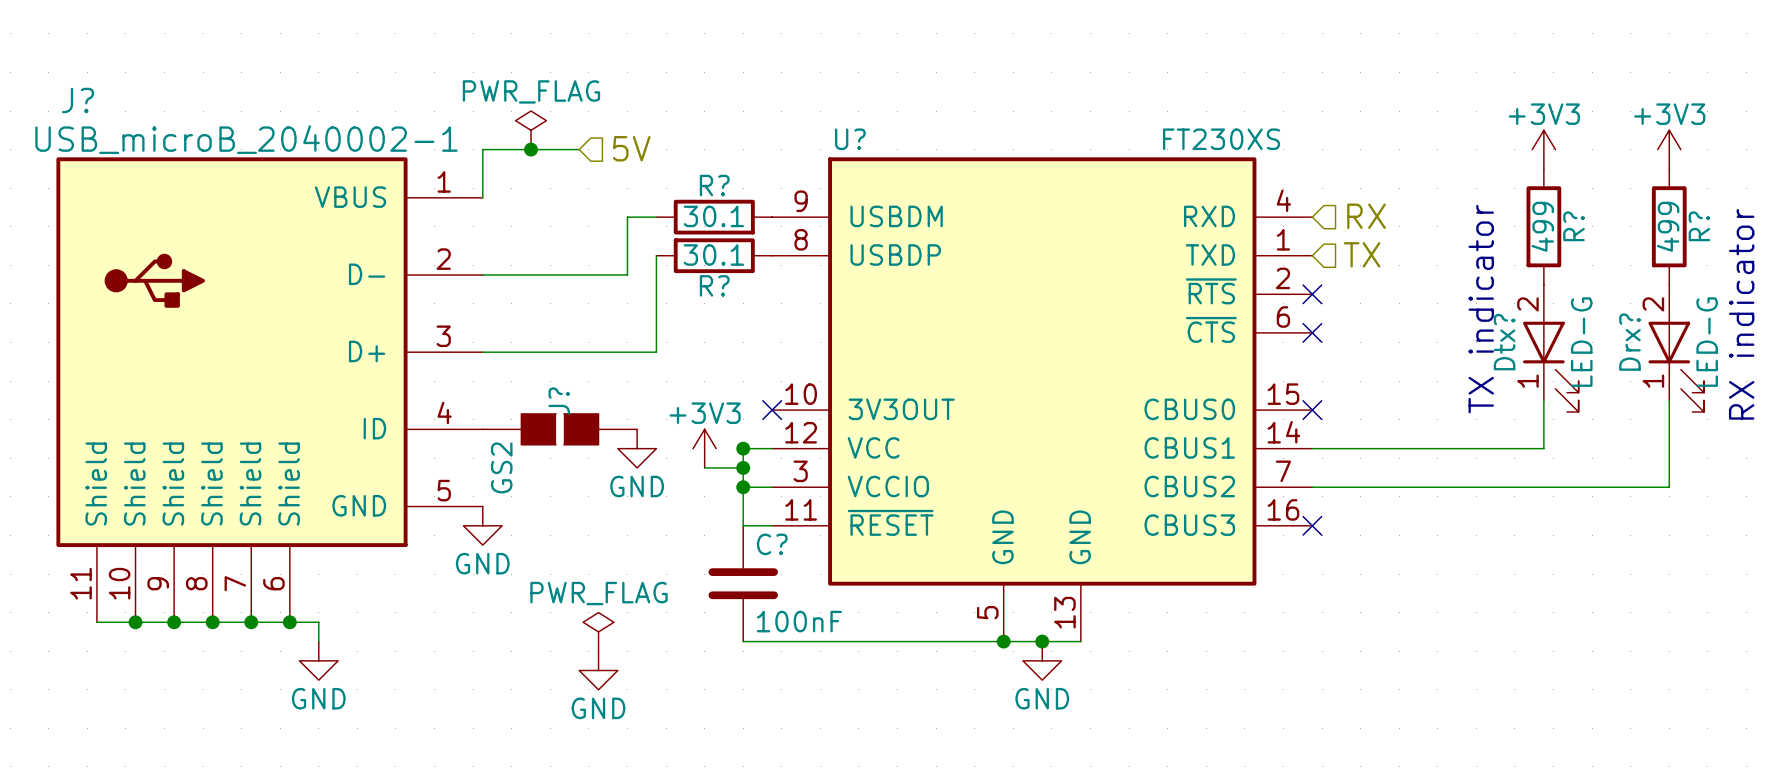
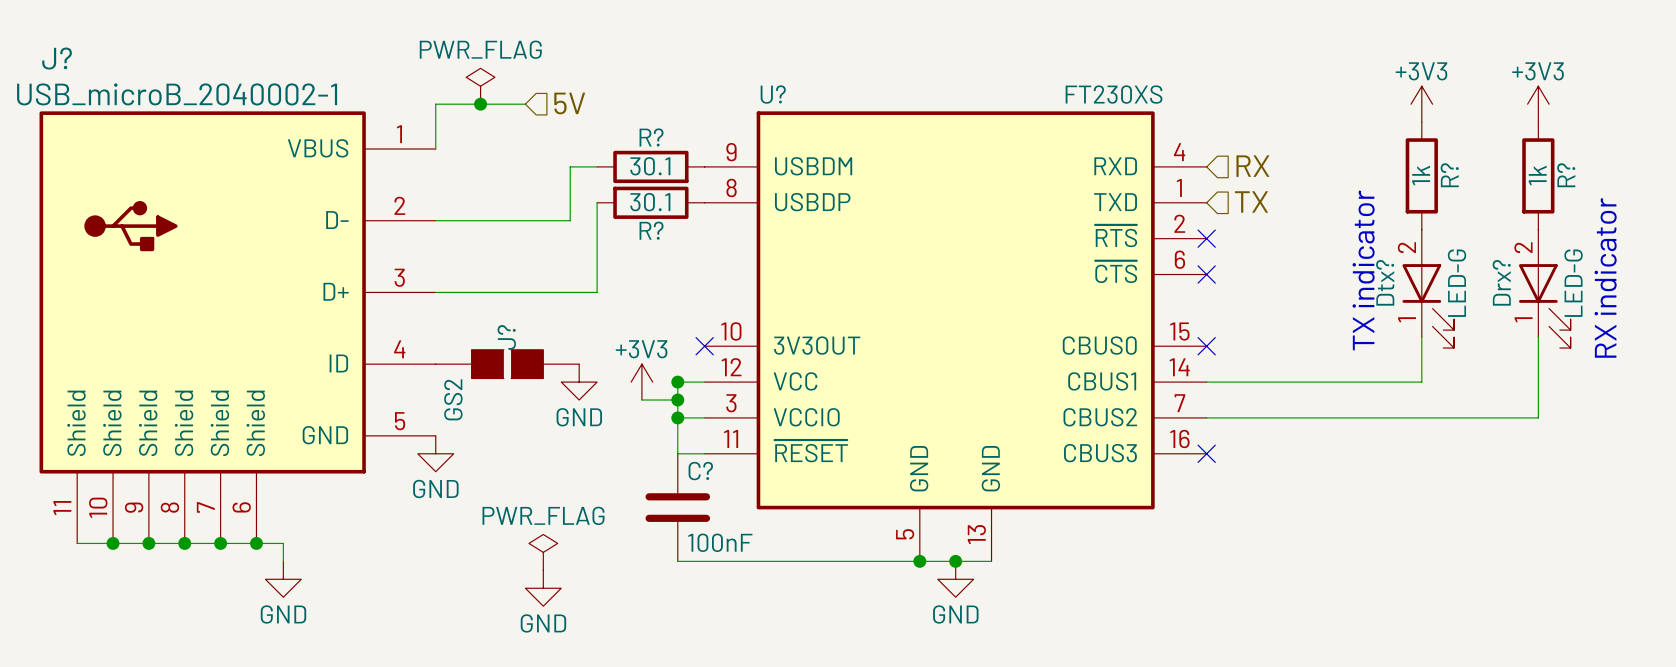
R? value: 499 (1542, 226) -> 1k (1421, 175)
R? value: 499 (1668, 226) -> 1k (1537, 175)

